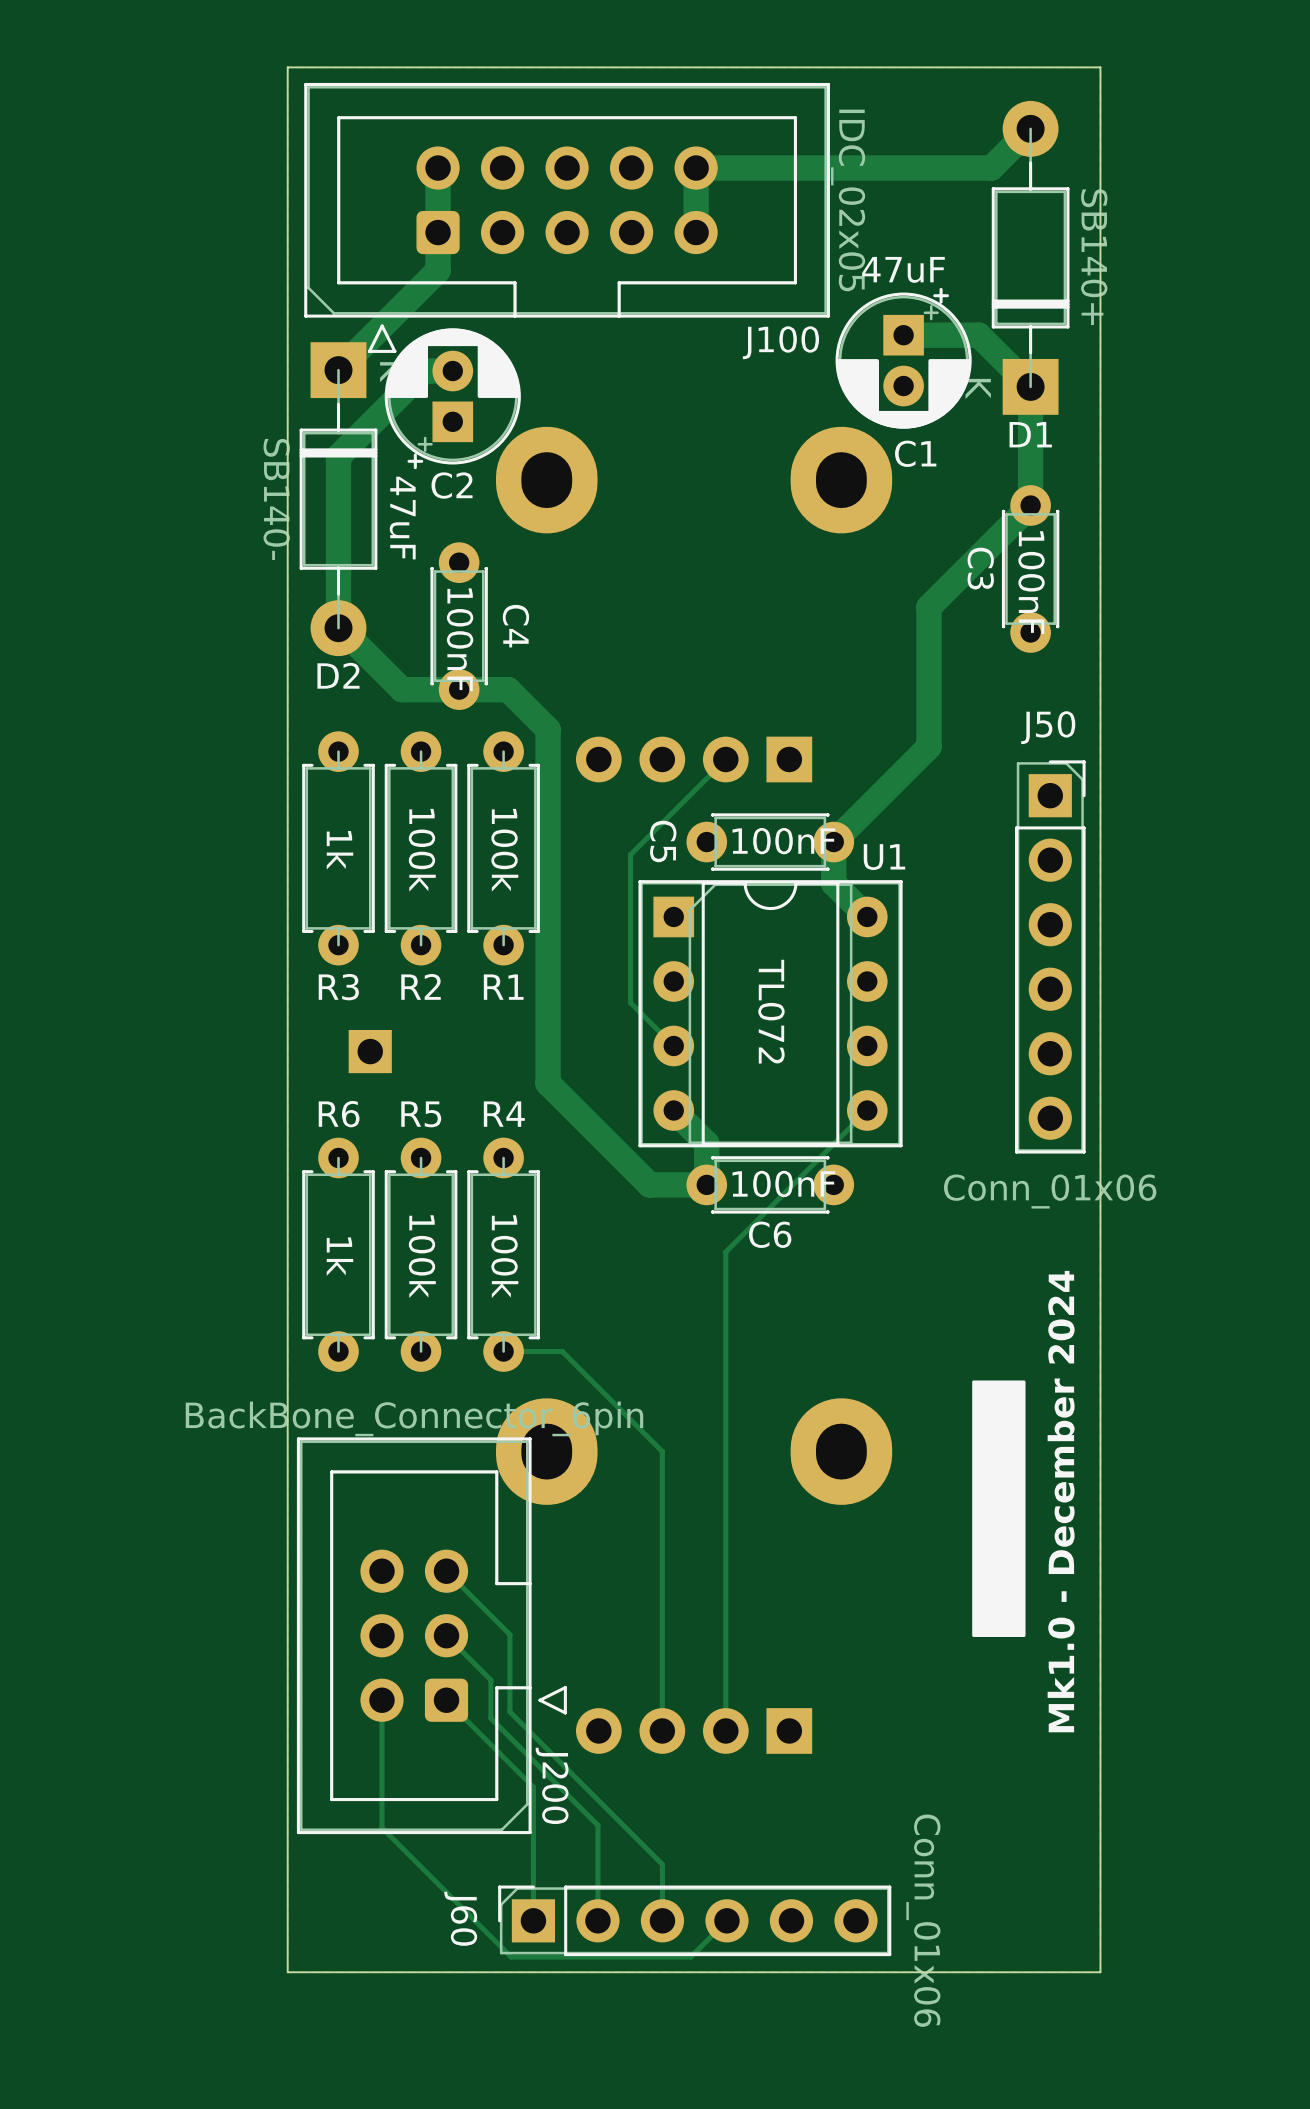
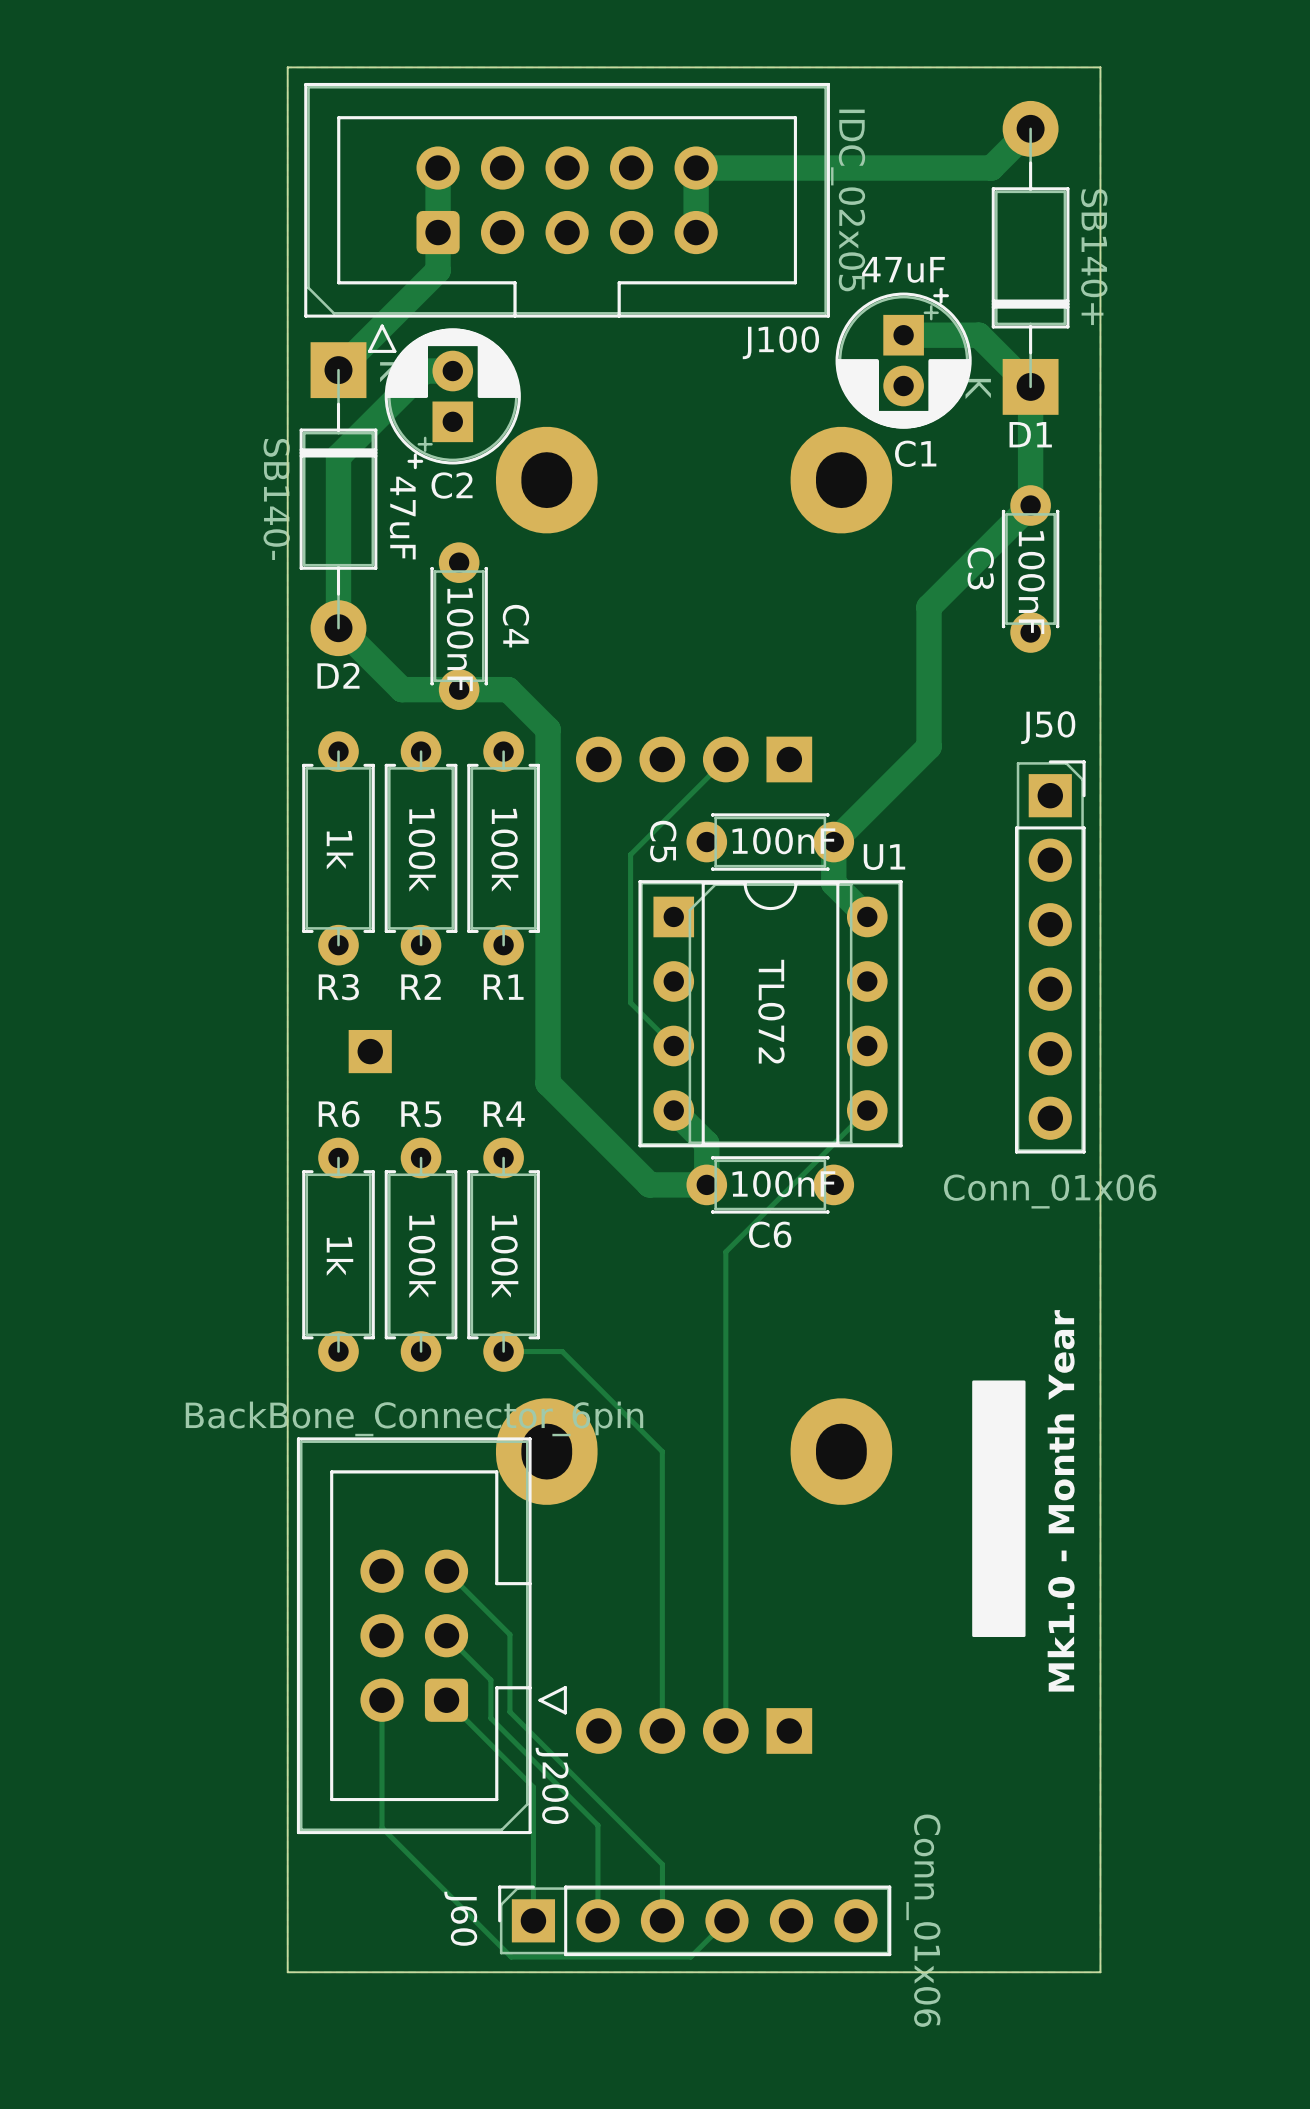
text: Mk1.0 - December 2024 (1061, 1501) -> Mk1.0 - Month Year (1061, 1500)

